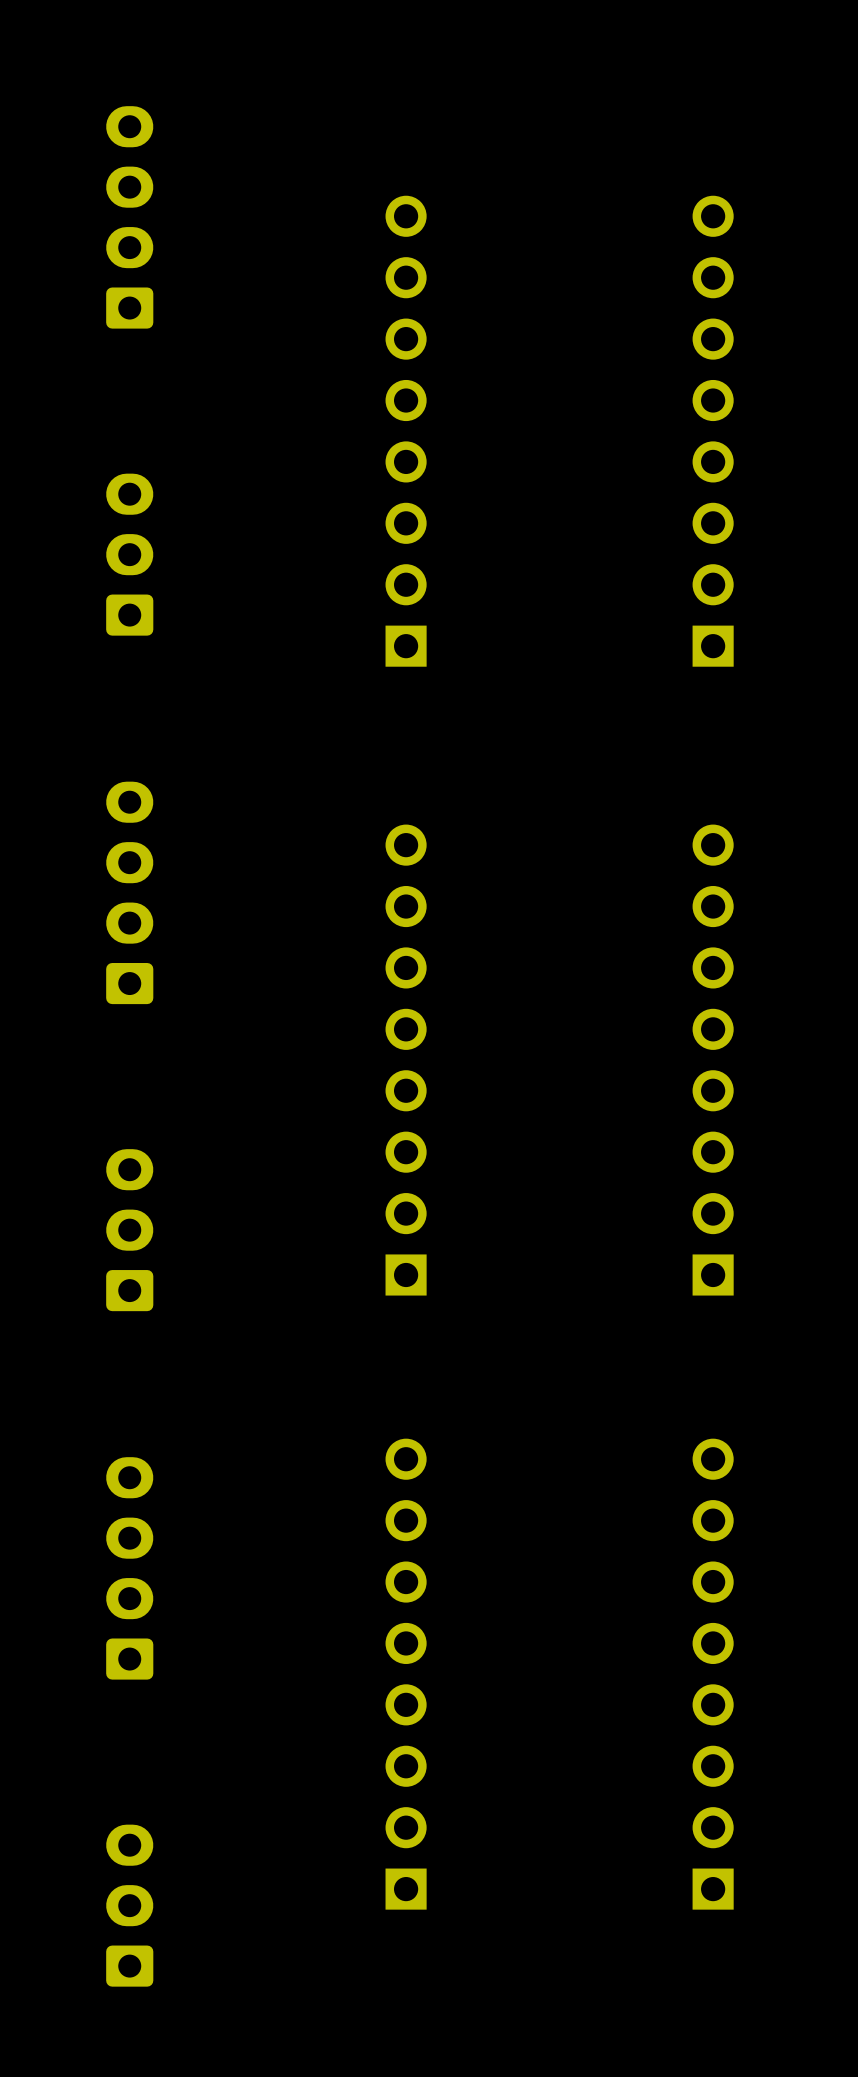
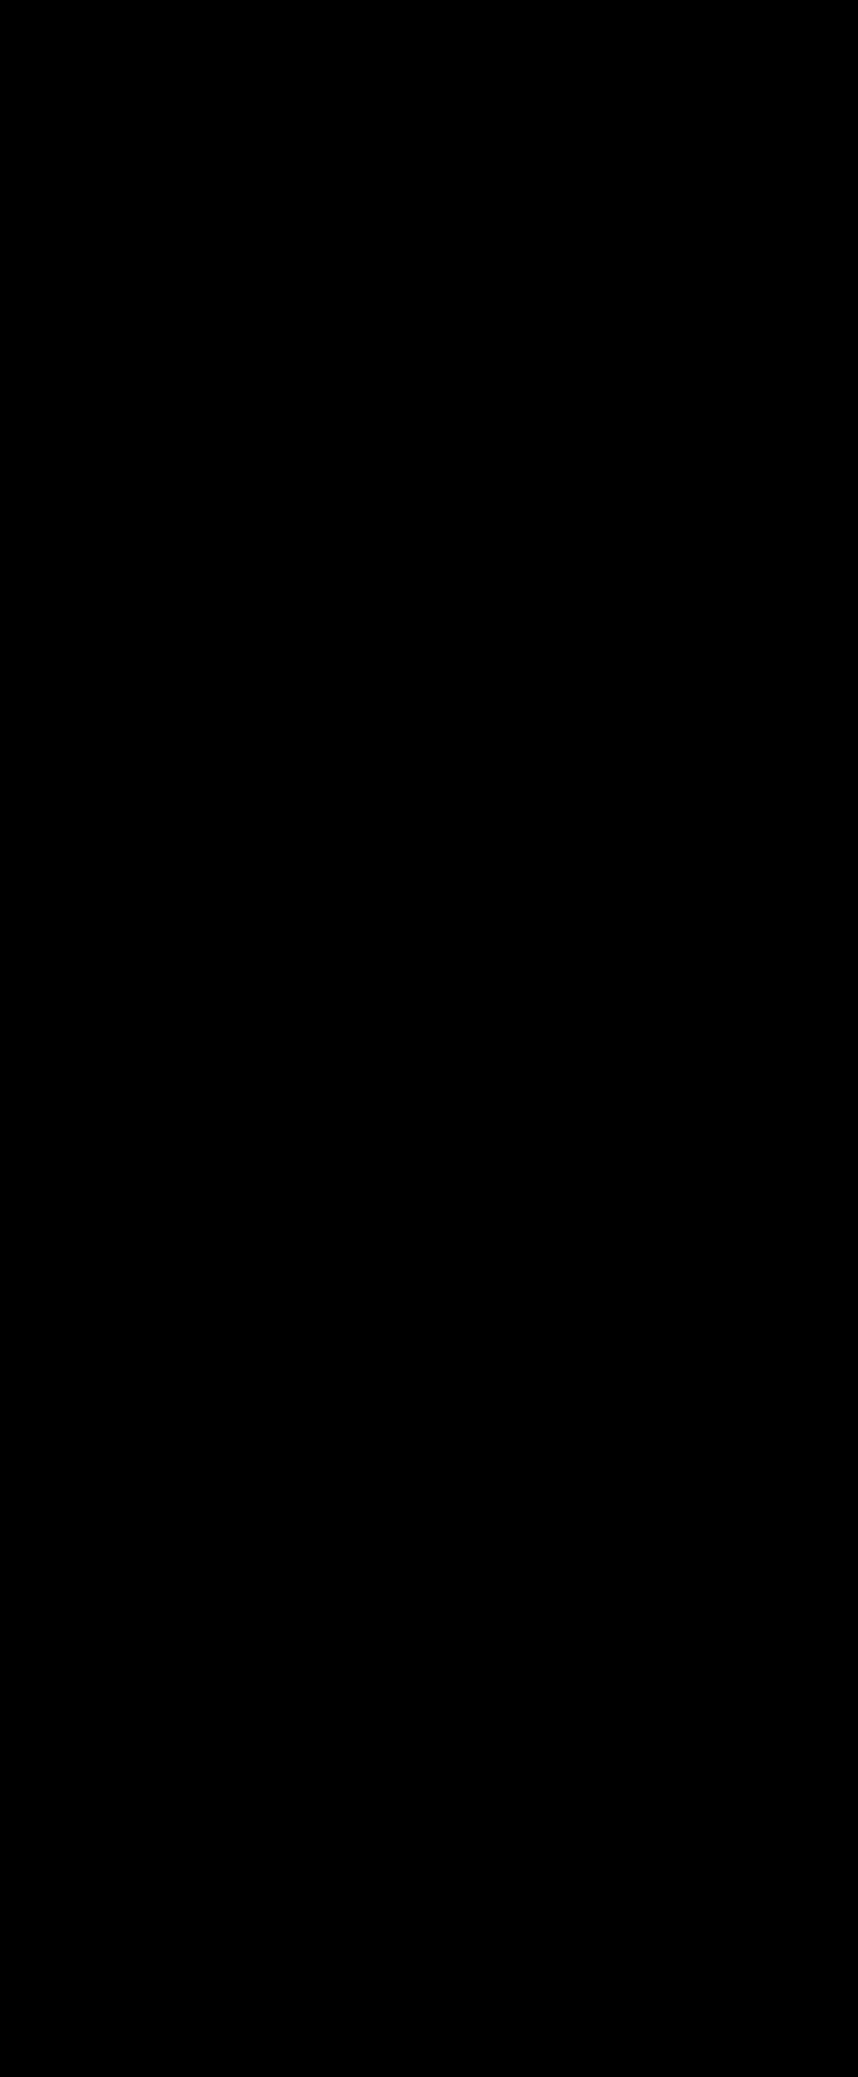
part: (129, 217) -> none
part: (406, 431) -> none
part: (713, 431) -> none
part: (129, 554) -> none
part: (129, 892) -> none
part: (406, 1060) -> none
part: (713, 1060) -> none
part: (129, 1230) -> none
part: (129, 1568) -> none
part: (406, 1674) -> none
part: (713, 1674) -> none
part: (129, 1905) -> none

